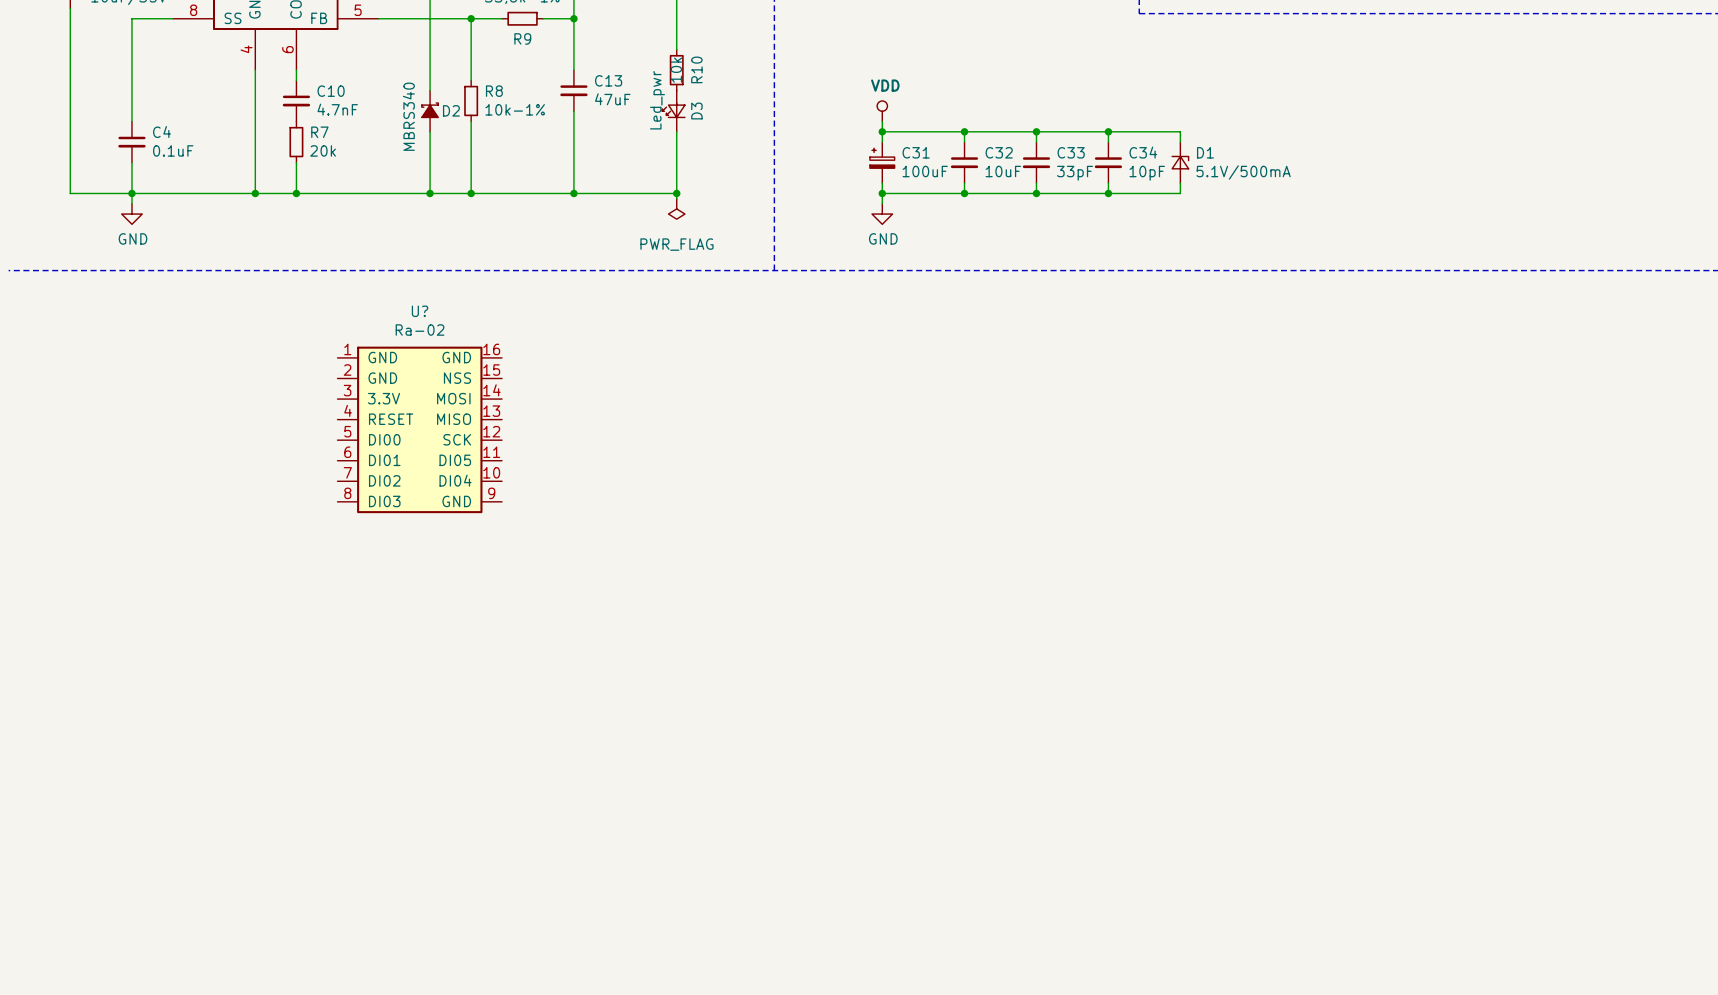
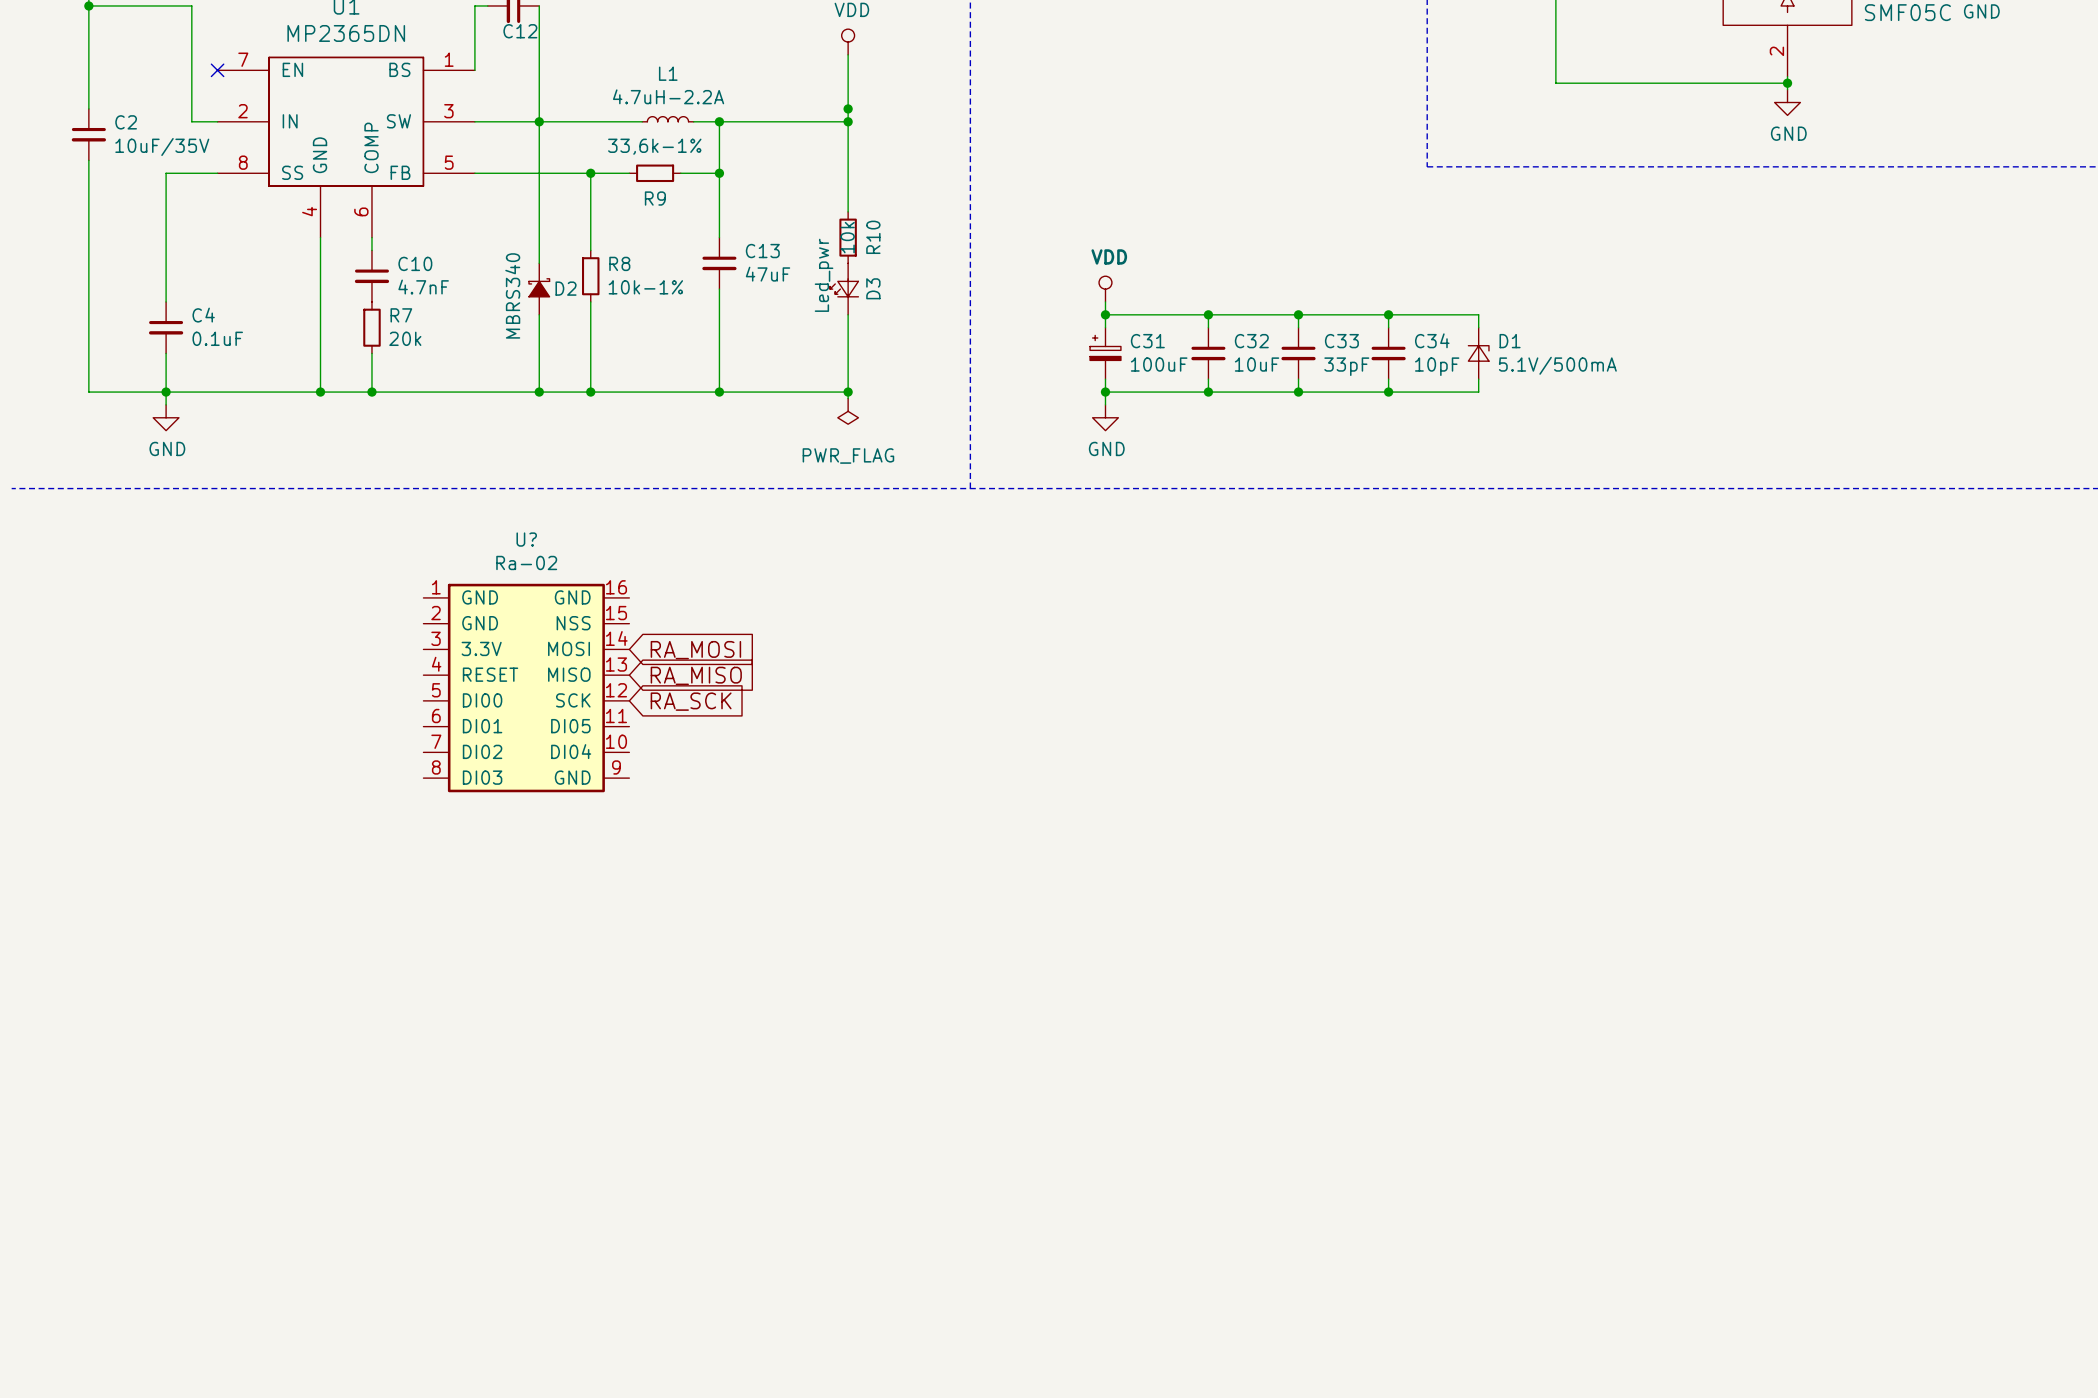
global label: none -> RA_MOSI (695, 650)
global label: none -> RA_MISO (696, 675)
global label: none -> RA_SCK (691, 701)

